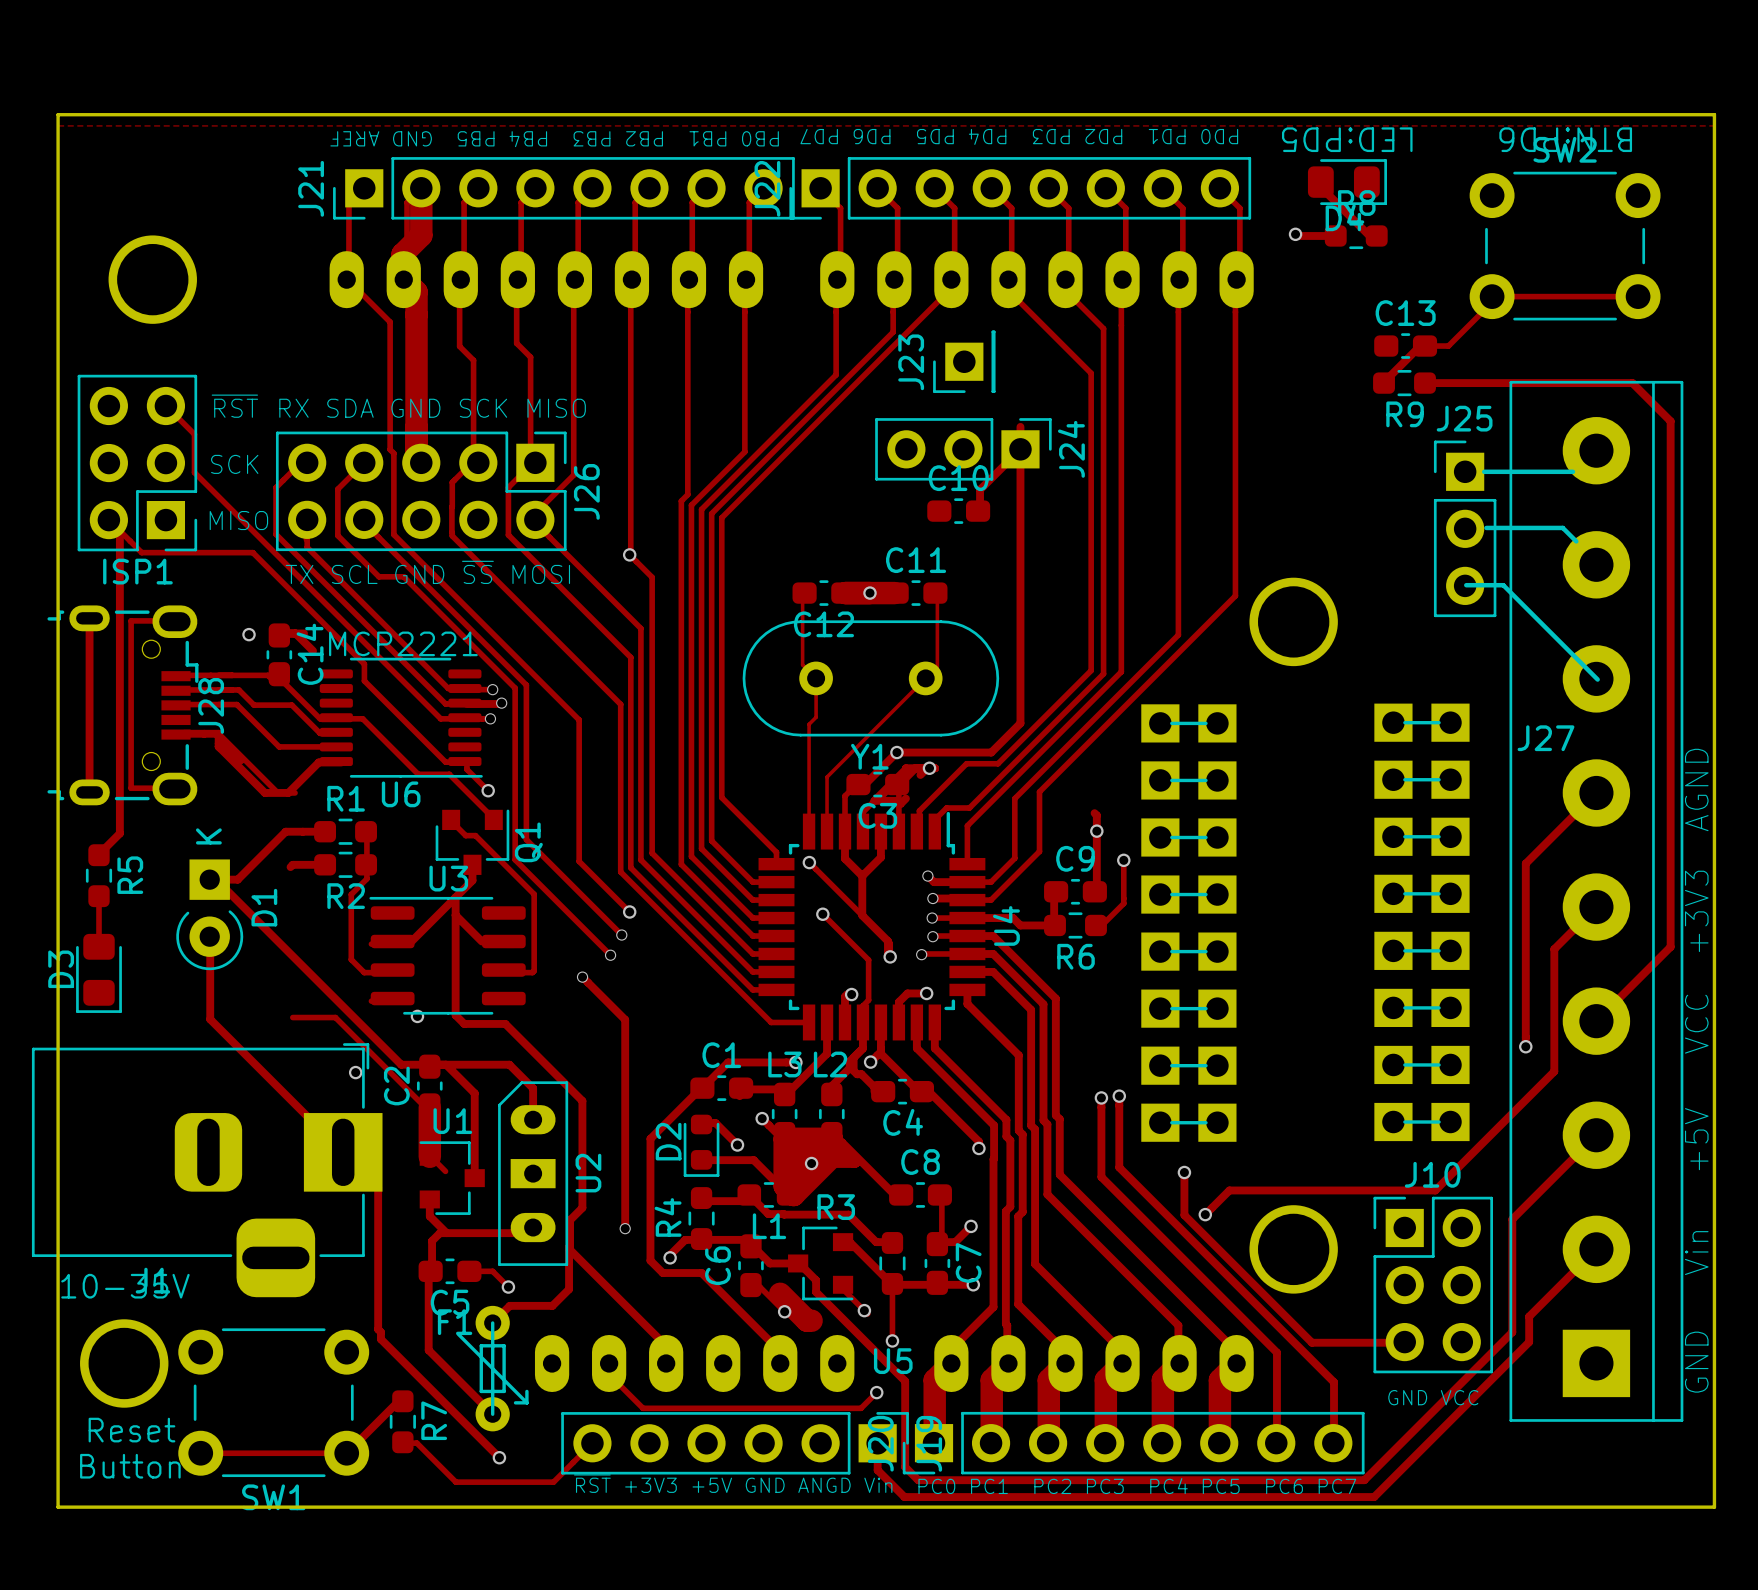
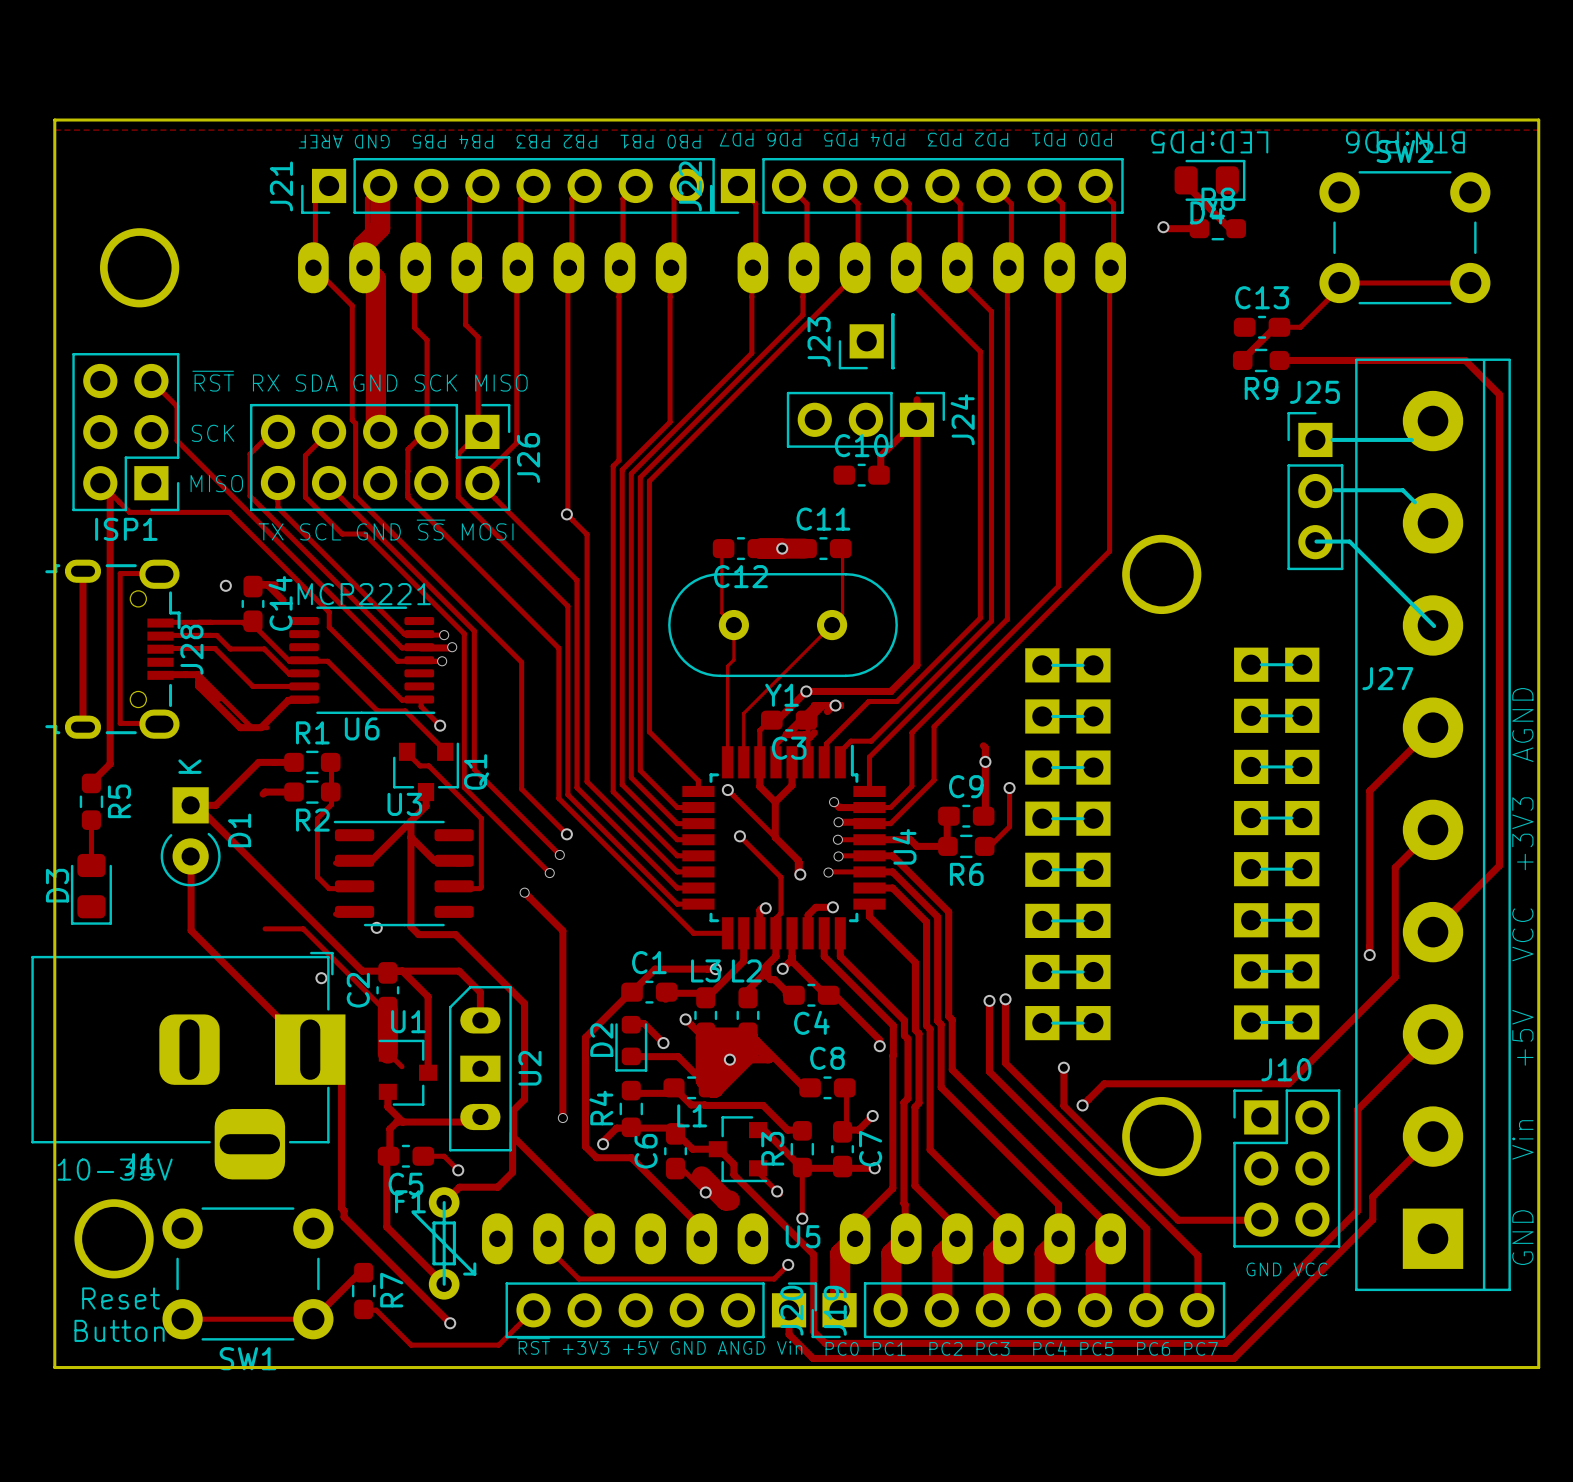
R3 name rotation: 0° (836, 1207) -> 90° counterclockwise (772, 1148)
R3 name position: R3 (836, 1207) -> R3 (772, 1148)

